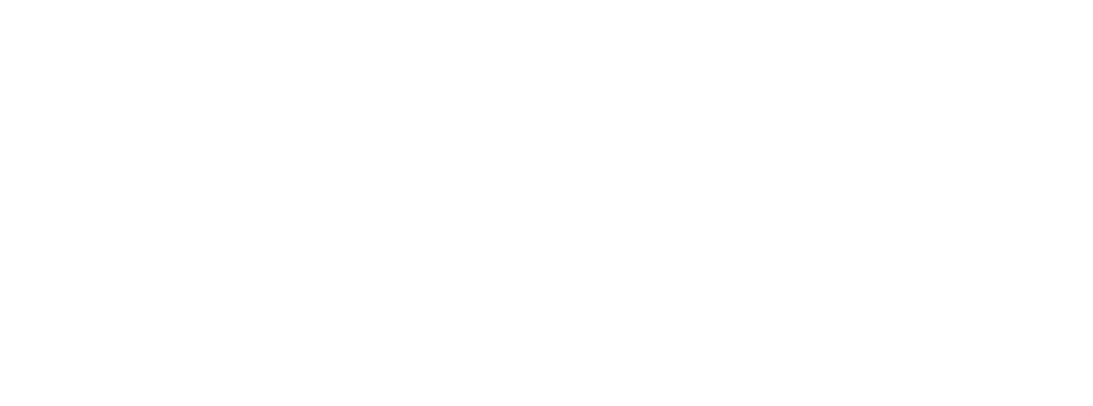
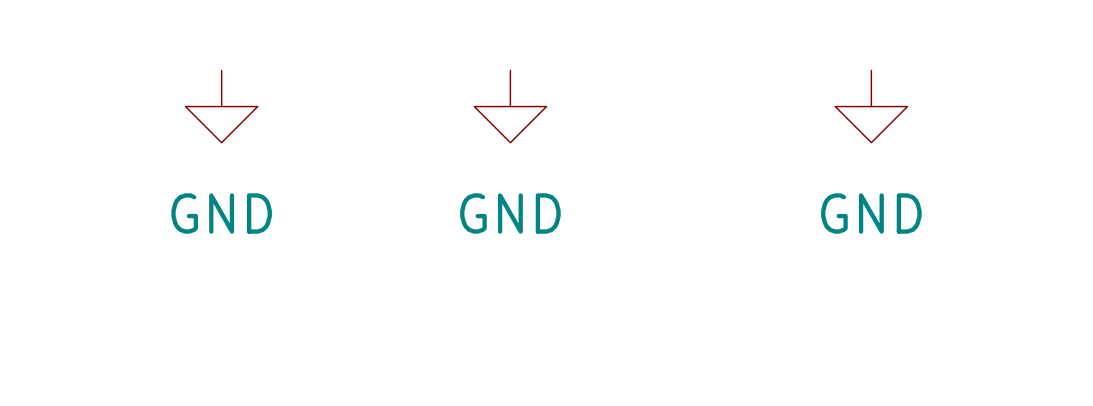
power symbol: none -> GND (221, 106)
power symbol: none -> GND (510, 106)
power symbol: none -> GND (871, 106)

